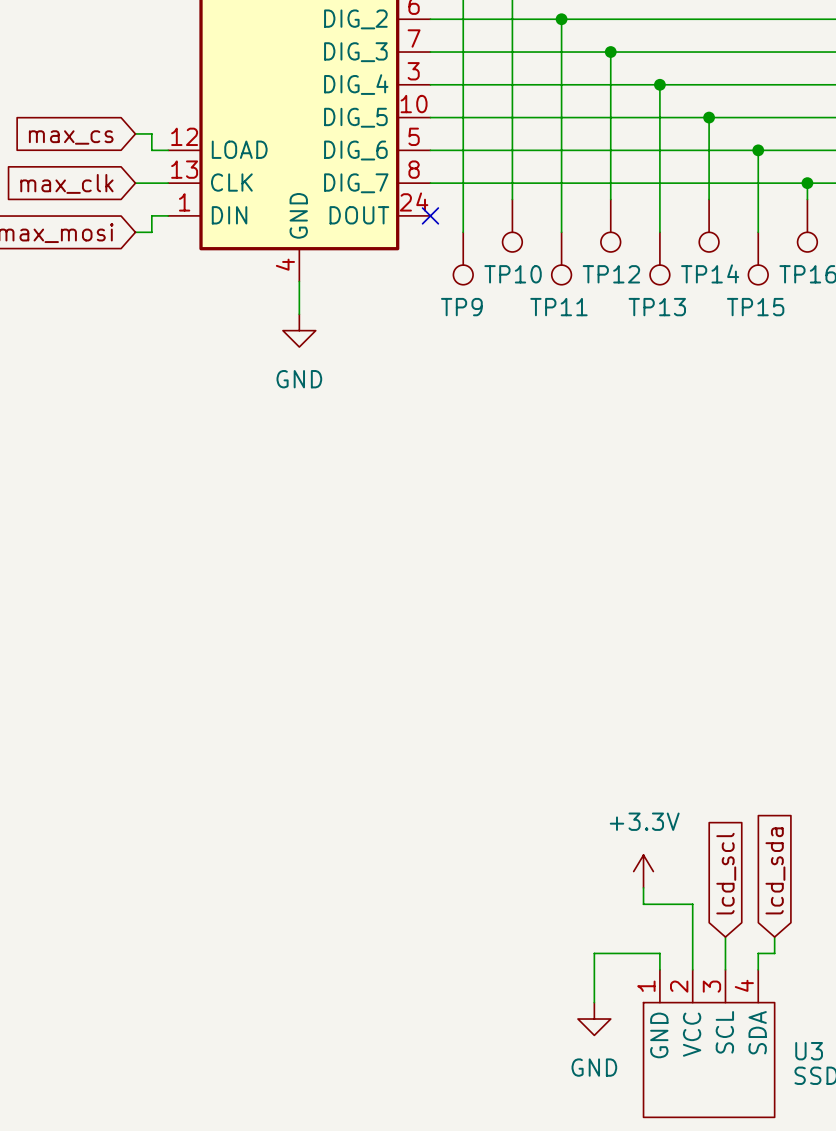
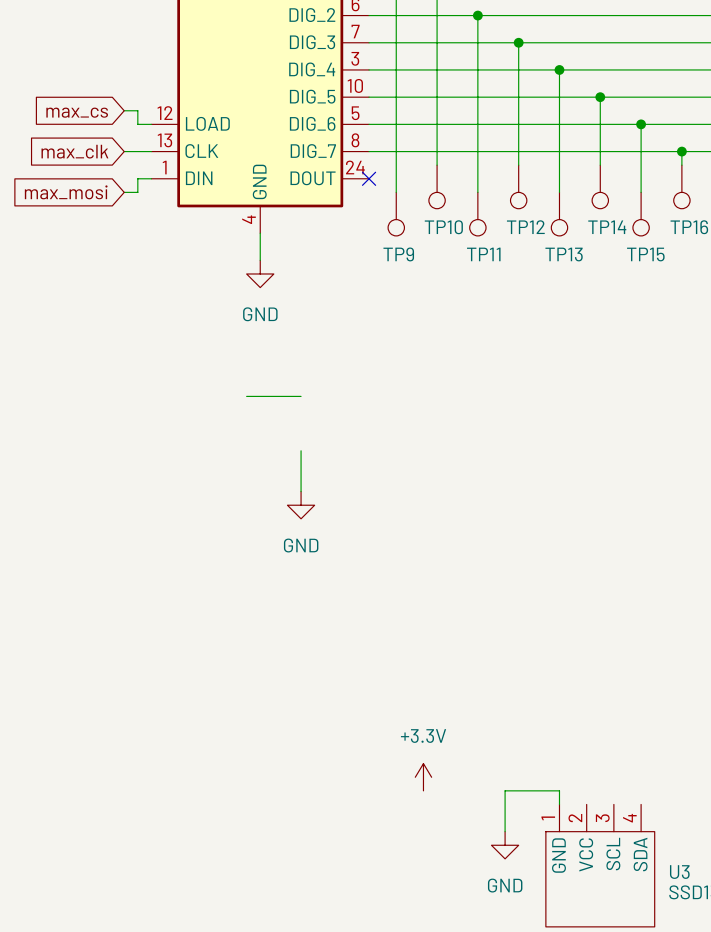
wire: none -> (246, 396) (301, 396)
wire: none -> (301, 450) (301, 491)
power symbol: none -> GND (301, 505)
global label: lcd_sda (775, 870) -> none
power symbol position: +3.3V (643, 871) -> +3.3V (423, 777)
global label: lcd_scl (726, 873) -> none
wire: (643, 887) (643, 904) (692, 904) (692, 969) -> none
wire: (725, 937) (725, 969) -> none
wire: (774, 937) (774, 953) (758, 953) (758, 969) -> none

